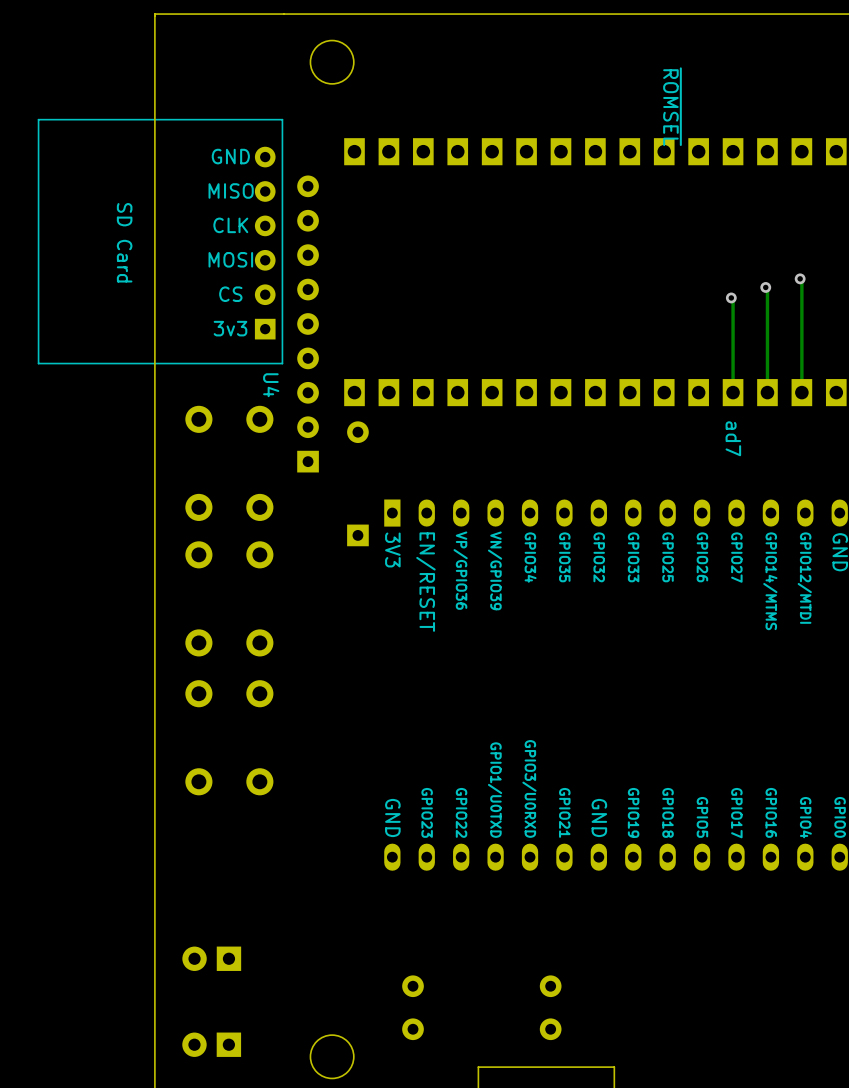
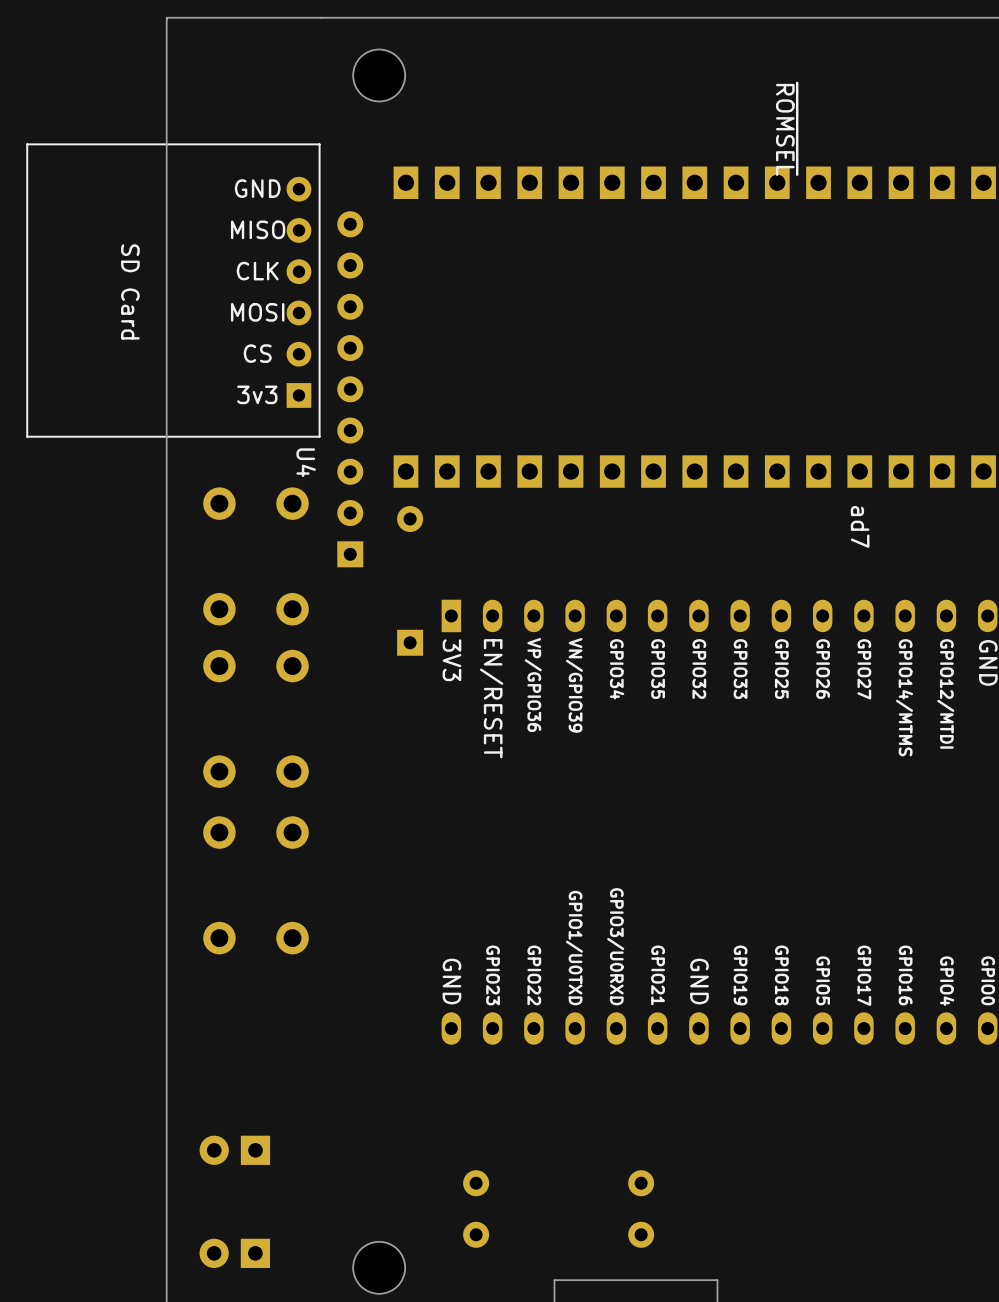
track: (800, 278) (801, 280) (801, 392) -> none
via: (800, 278) -> none
track: (765, 287) (767, 289) (767, 392) -> none
via: (765, 287) -> none
track: (731, 297) (733, 299) (733, 392) -> none
via: (731, 297) -> none

